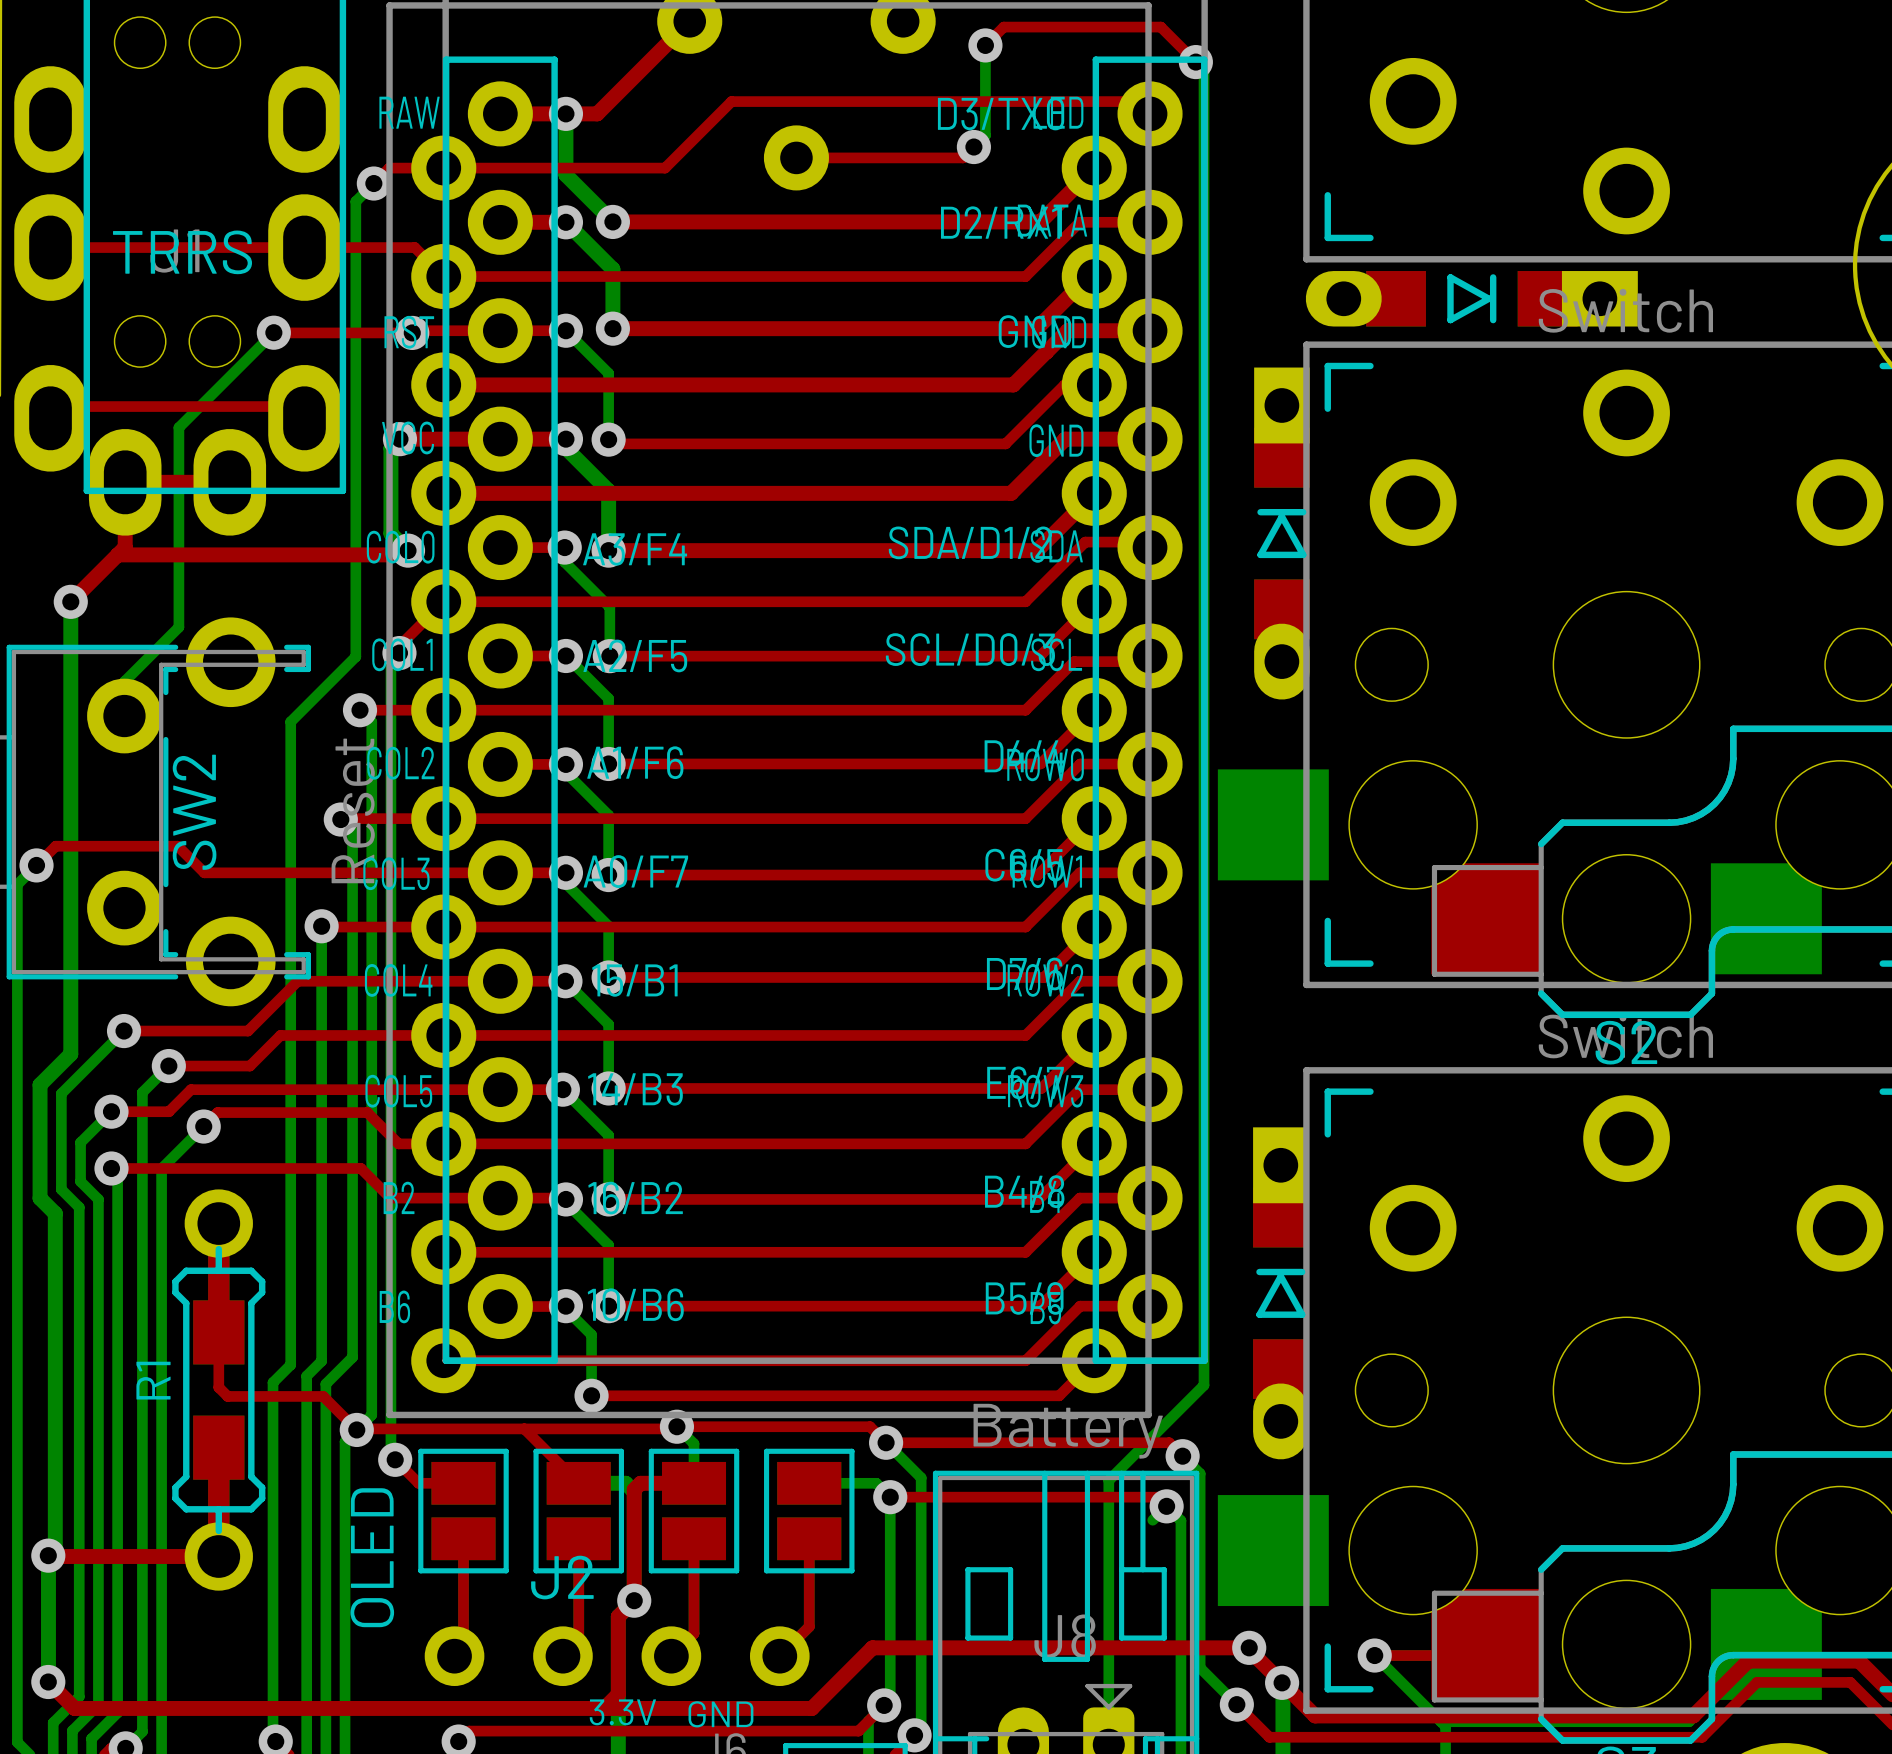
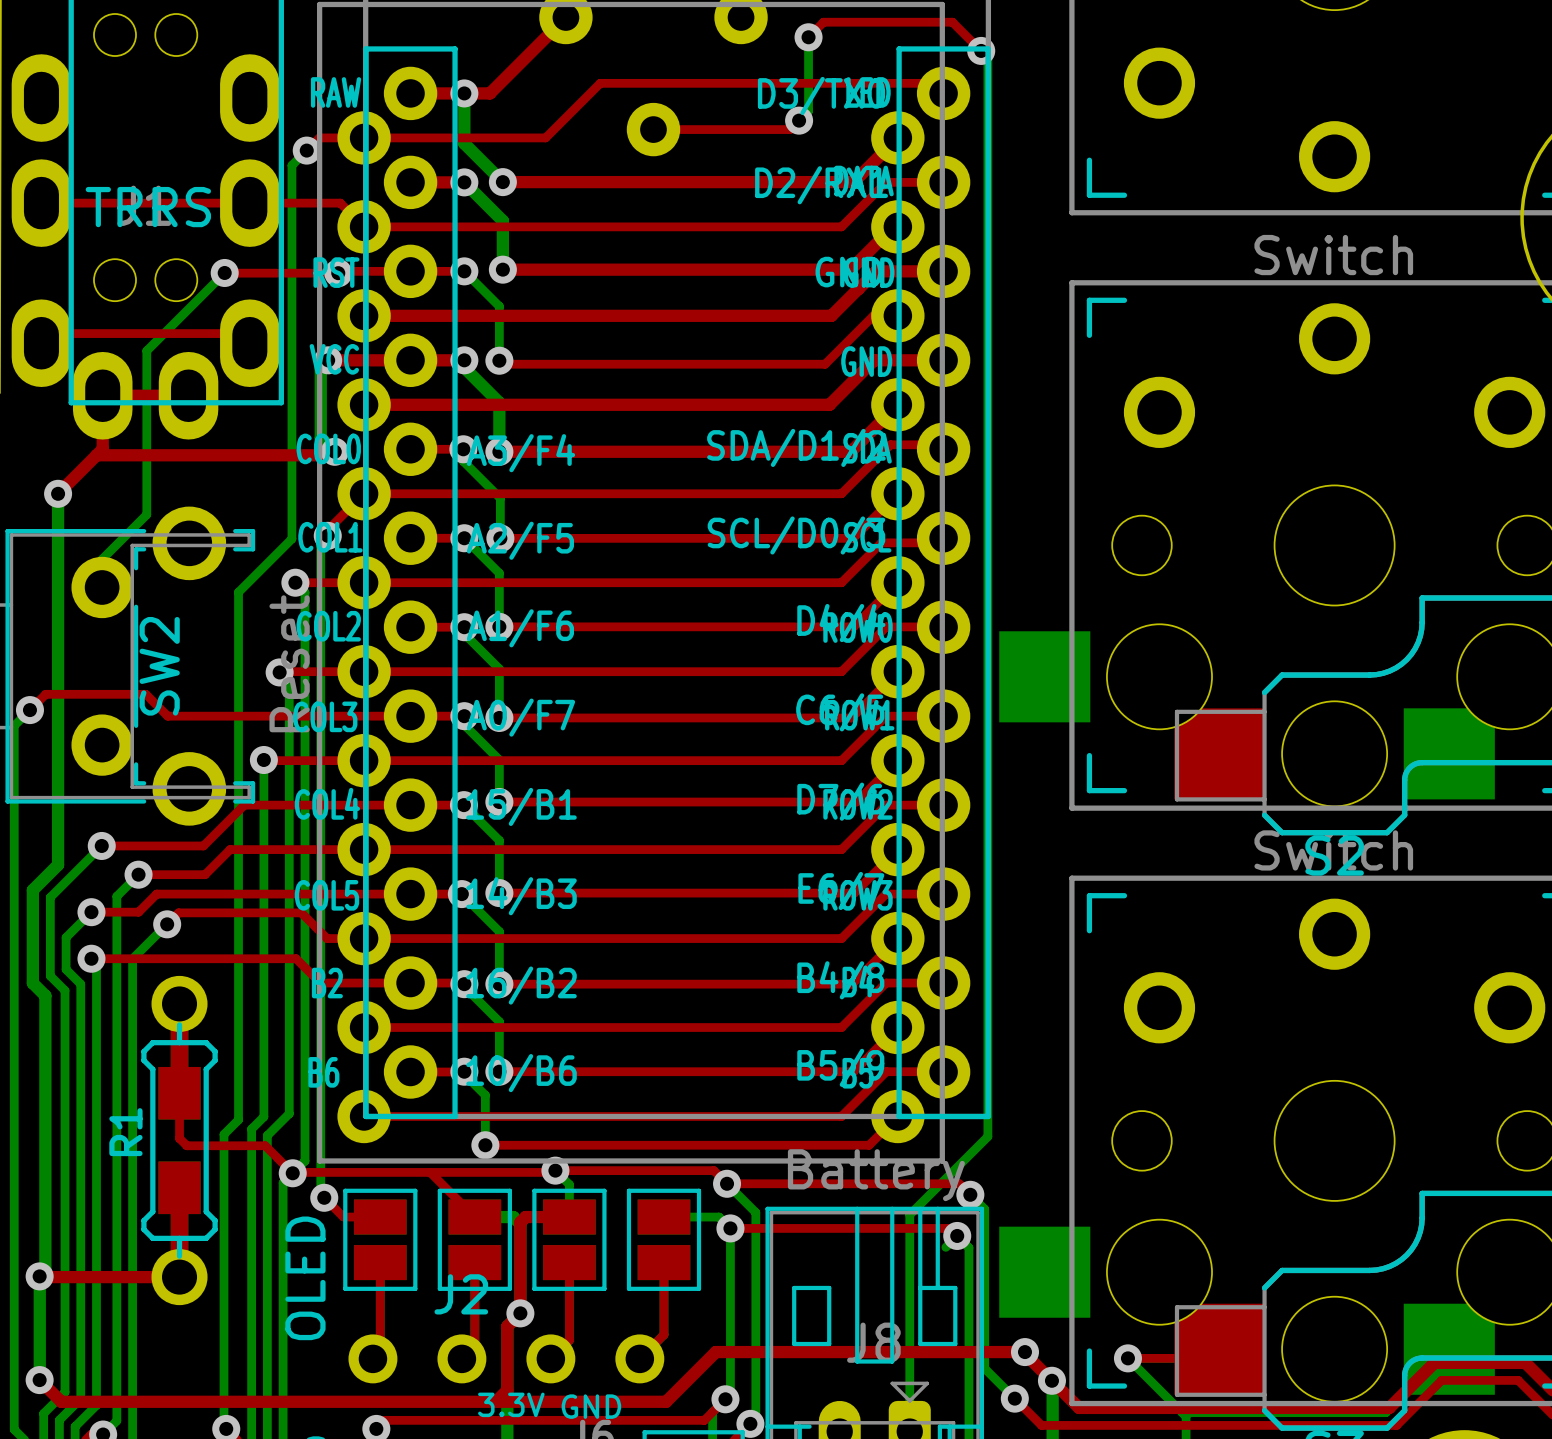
part: (1471, 298) -> none
part: (1281, 533) -> none
part: (1280, 1293) -> none

